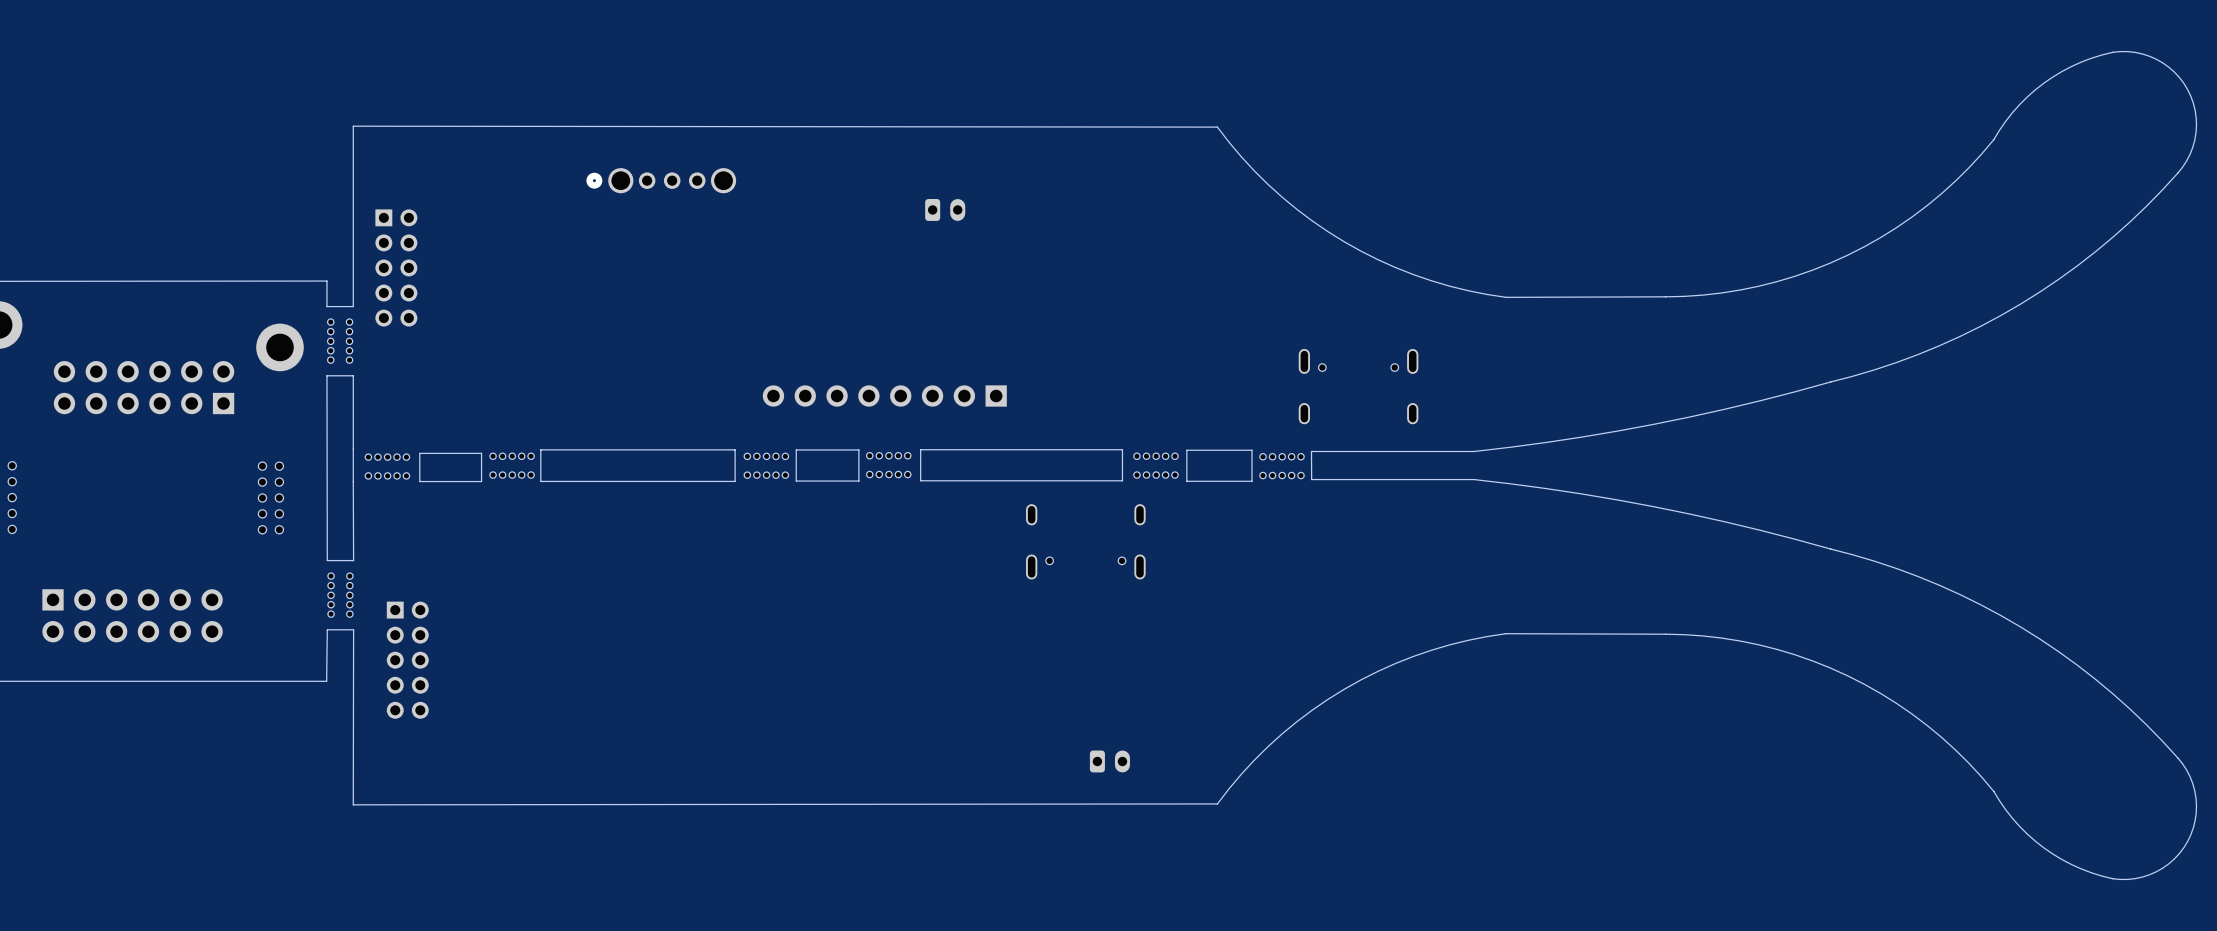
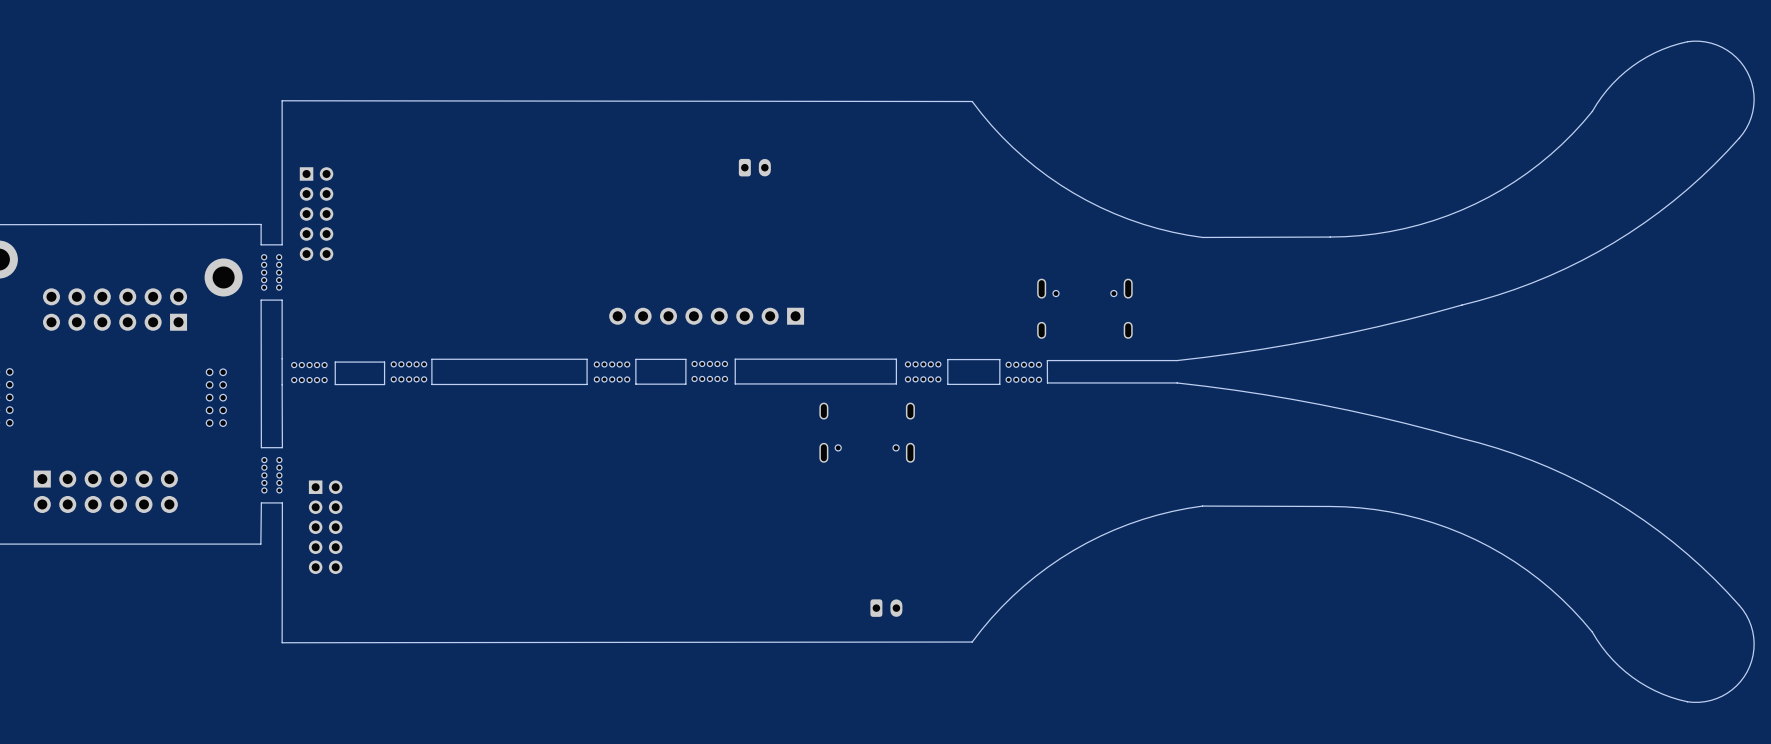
part: (661, 180) -> none

